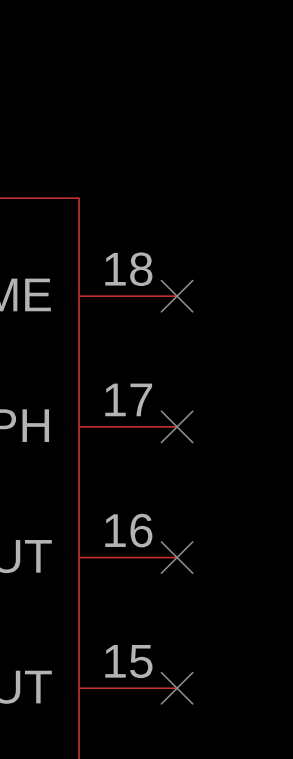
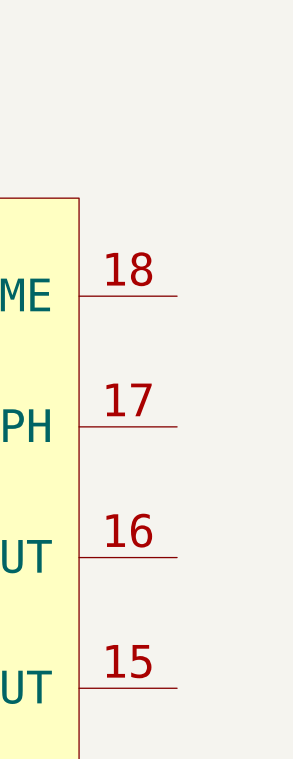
no-connect mark: (177, 296) -> none
no-connect mark: (177, 426) -> none
no-connect mark: (177, 557) -> none
no-connect mark: (177, 688) -> none

